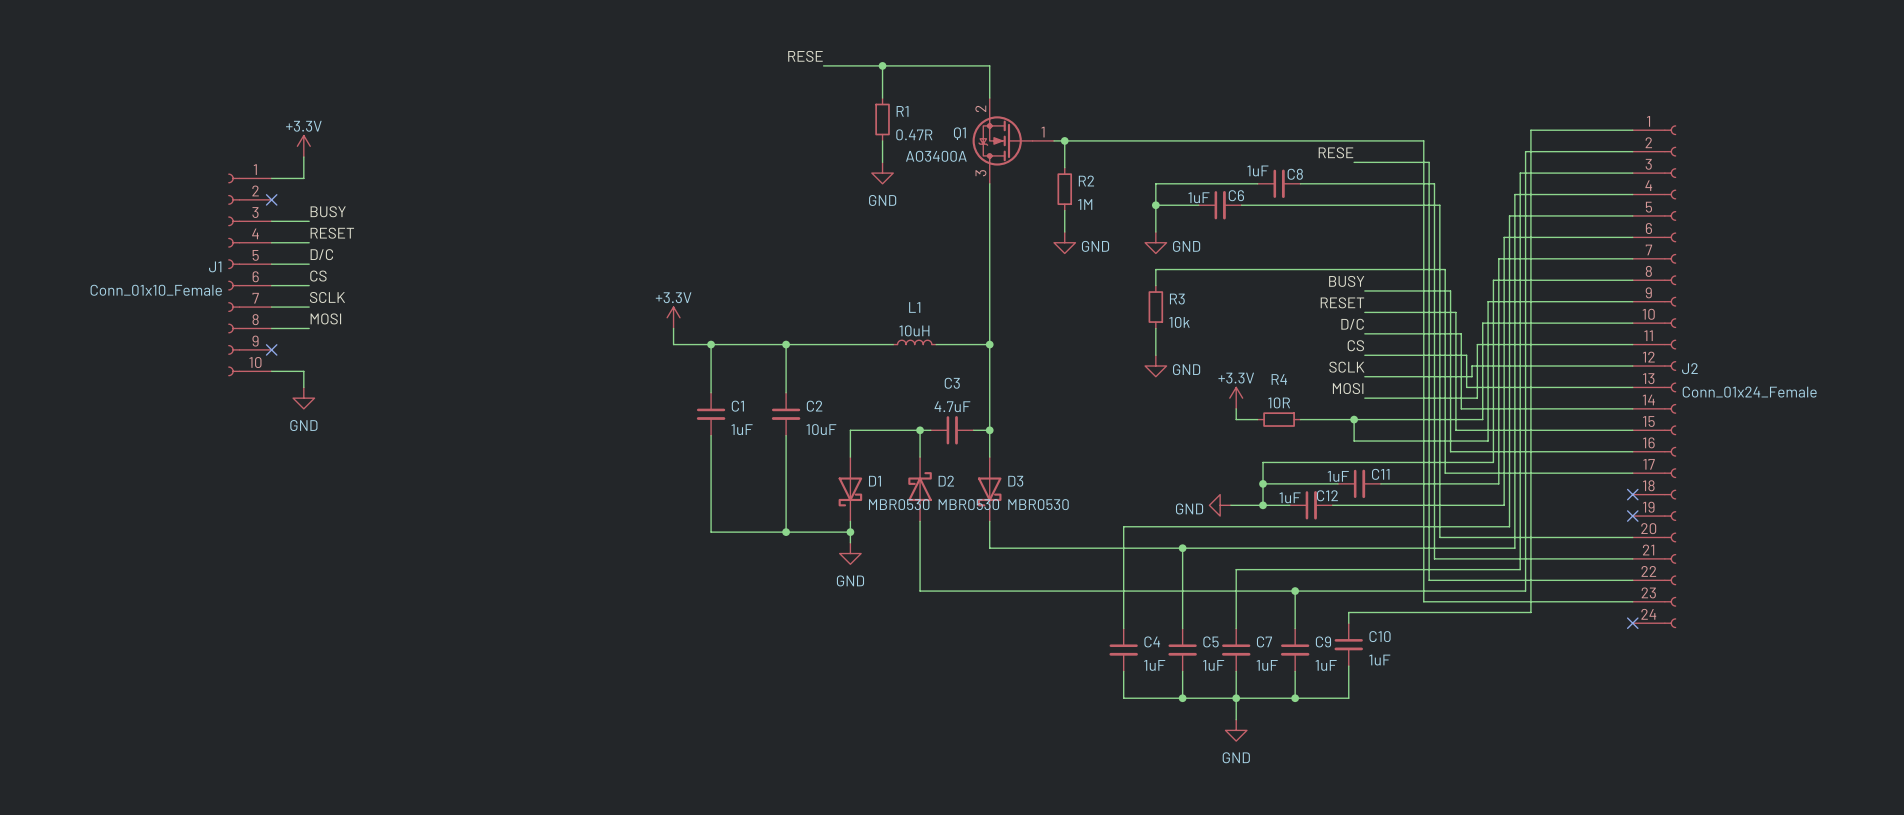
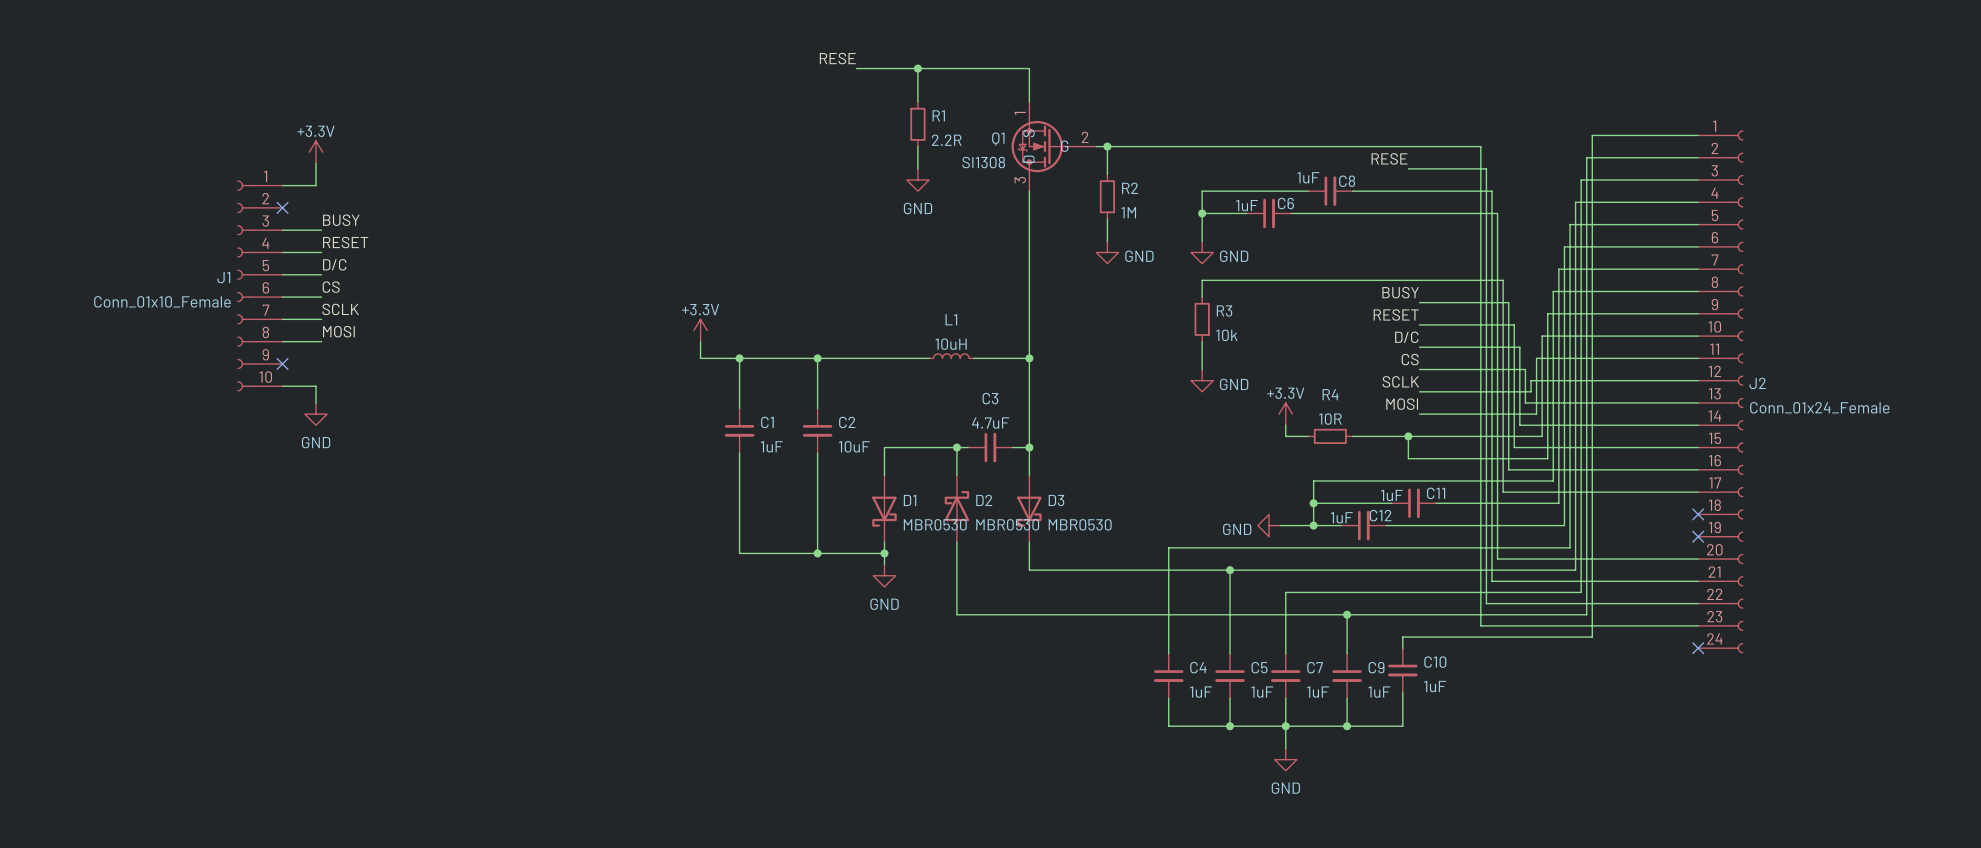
Q1 pin number: 2 (980, 108) -> 1 (1020, 113)
Q1 pin name: none -> S (1028, 133)
Q1 pin number: 1 (1043, 132) -> 2 (1085, 137)
R1 value: 0.47R (914, 134) -> 2.2R (946, 140)
Q1 pin name: none -> G (1064, 146)
Q1 pin name: none -> D (1028, 159)
Q1 value: AO3400A (936, 156) -> SI1308 (983, 162)

